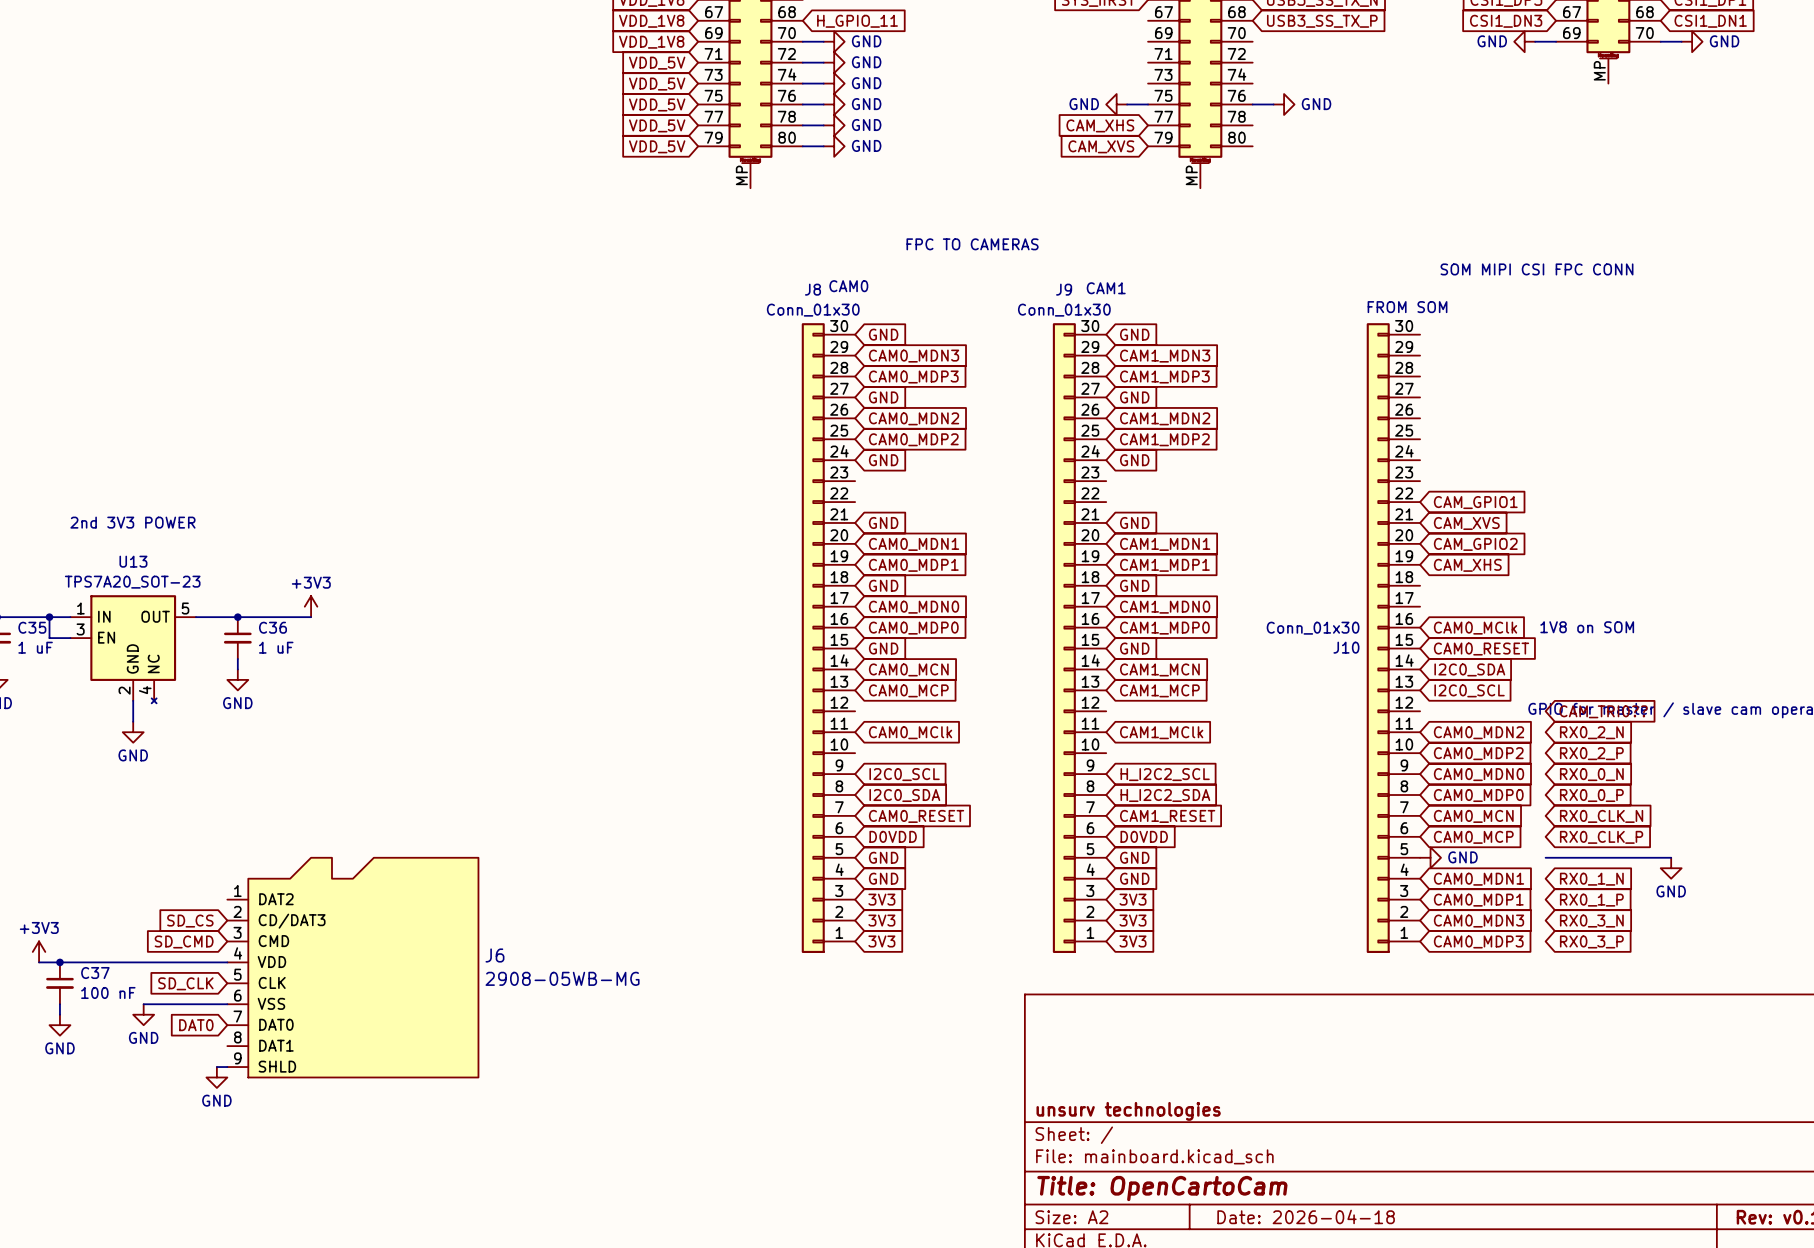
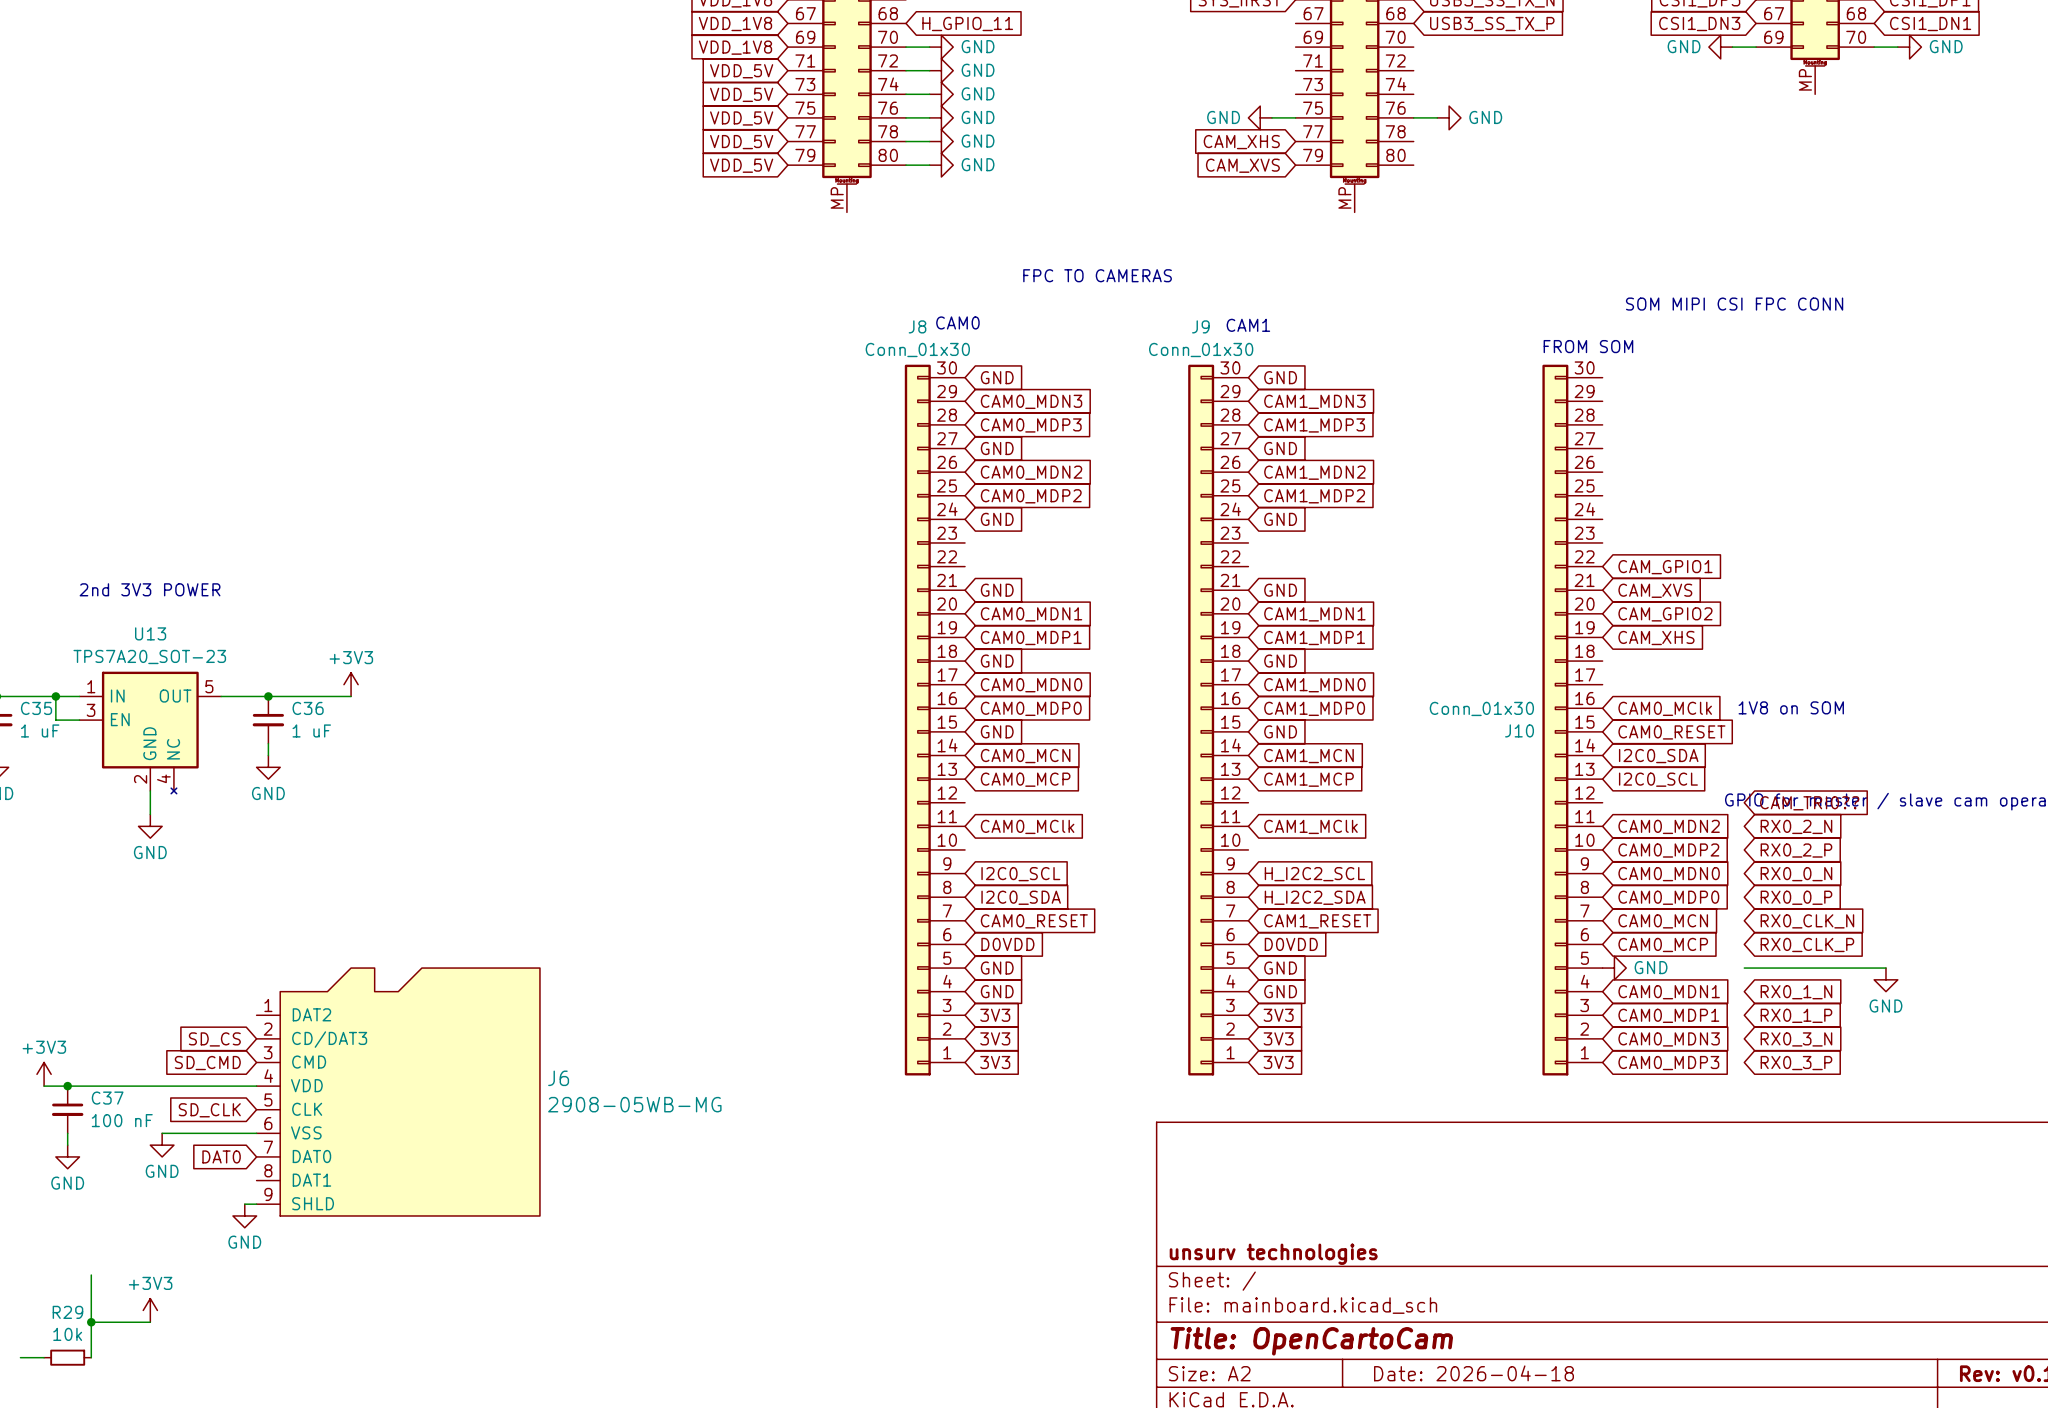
wire: none -> (91, 1275) (91, 1357)
power symbol: none -> +3V3 (150, 1310)
wire: none -> (91, 1322) (150, 1322)
junction: none -> (91, 1322)
wire: none -> (20, 1357) (44, 1357)
R29: none -> 10k (67, 1357)

